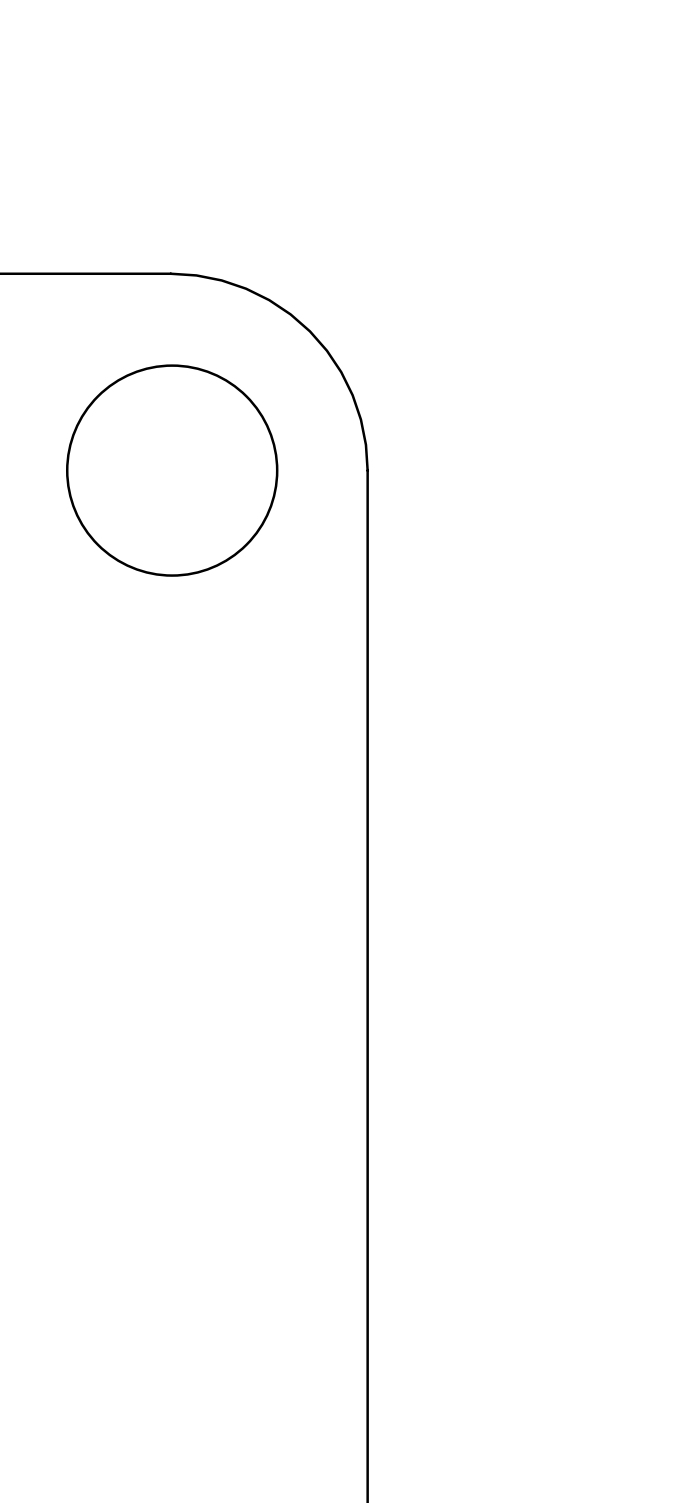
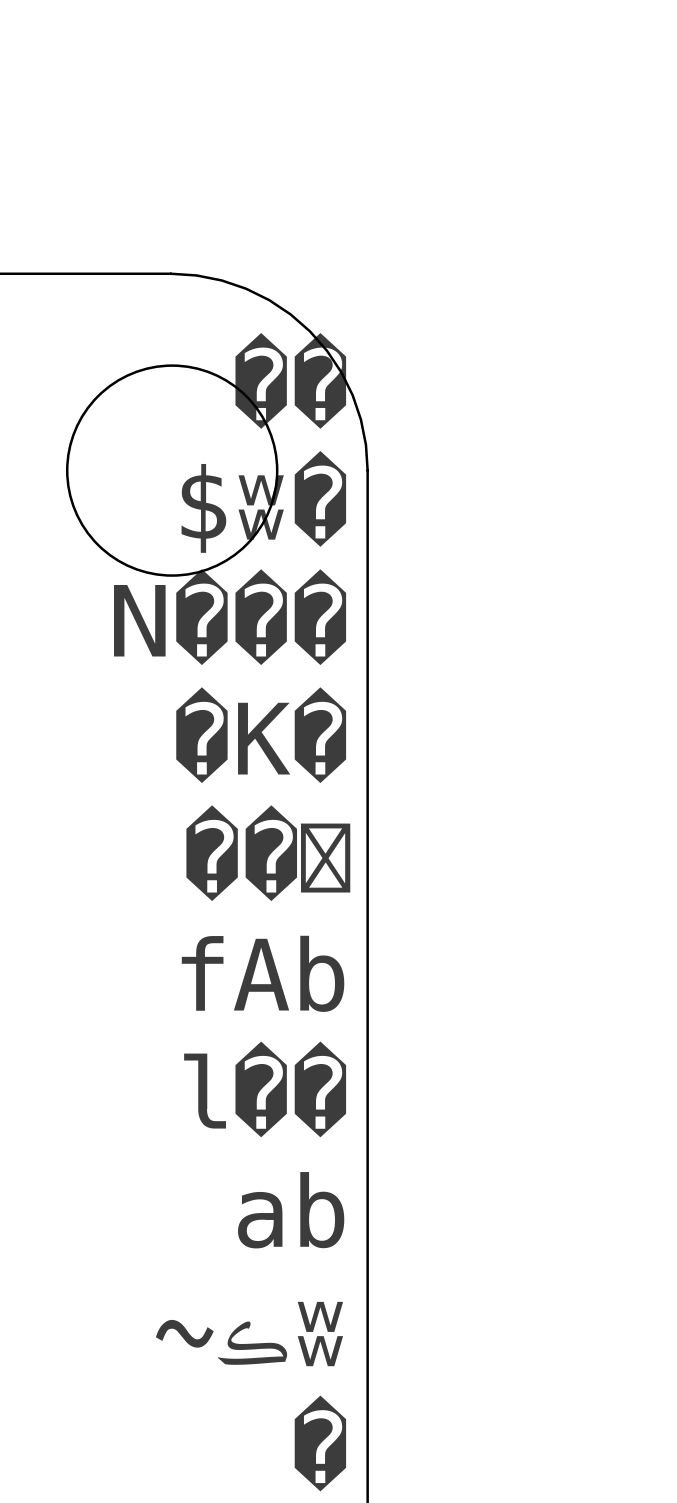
drawing: none -> [114, 333, 351, 1492]

